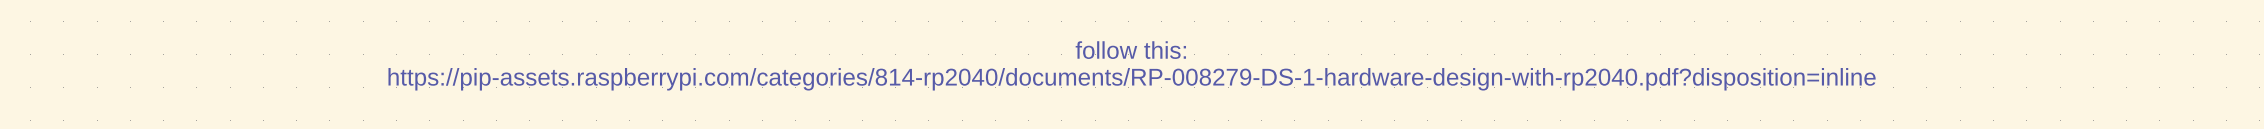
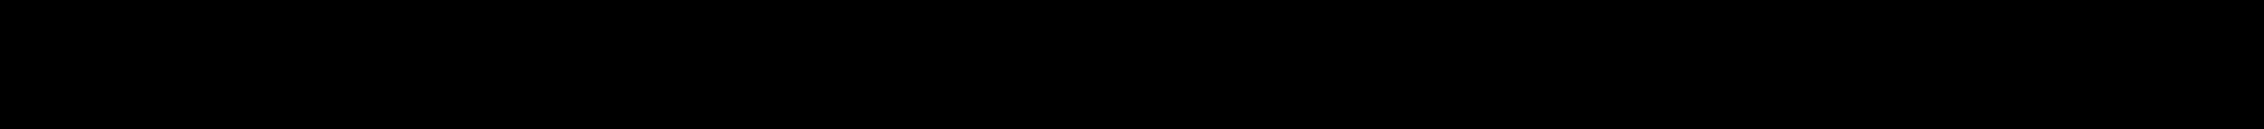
text: follow this: (1130, 50) -> none
text: https://pip-assets.raspberrypi.com/categories/814-rp2040/documents/RP-008279-DS-1-hardware-design-with-rp2040.pdf?disposition=inline (1132, 79) -> none

